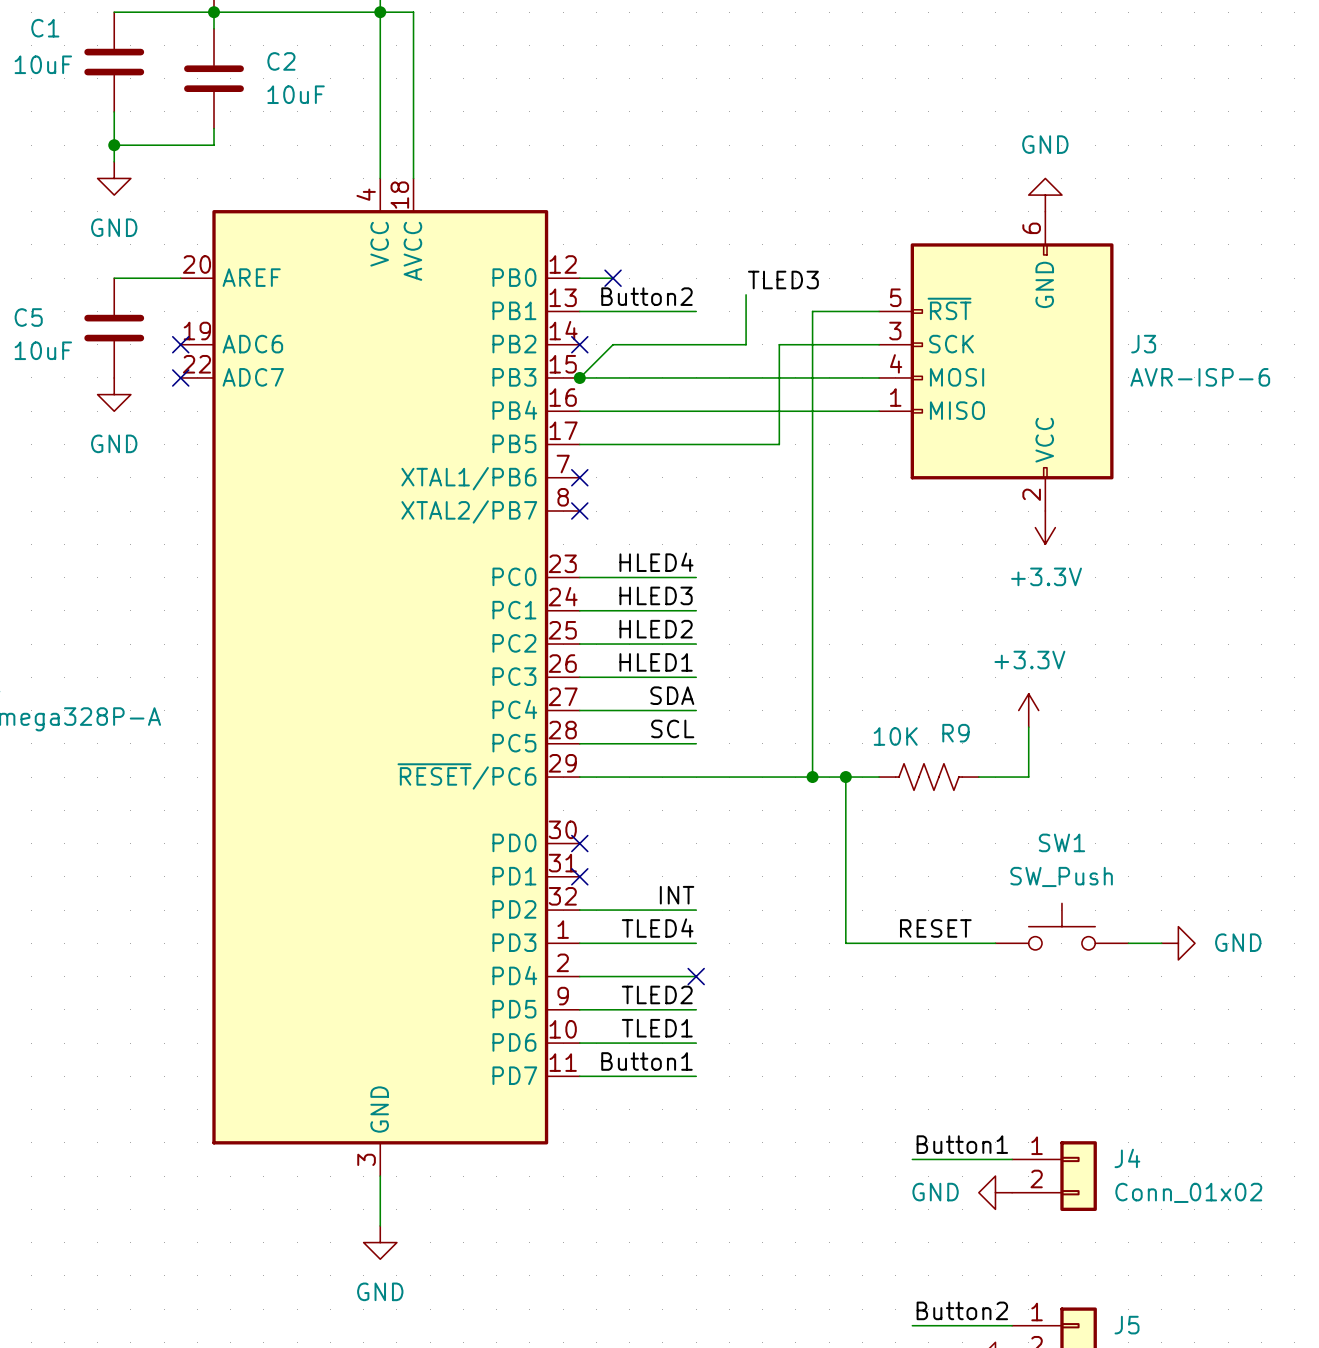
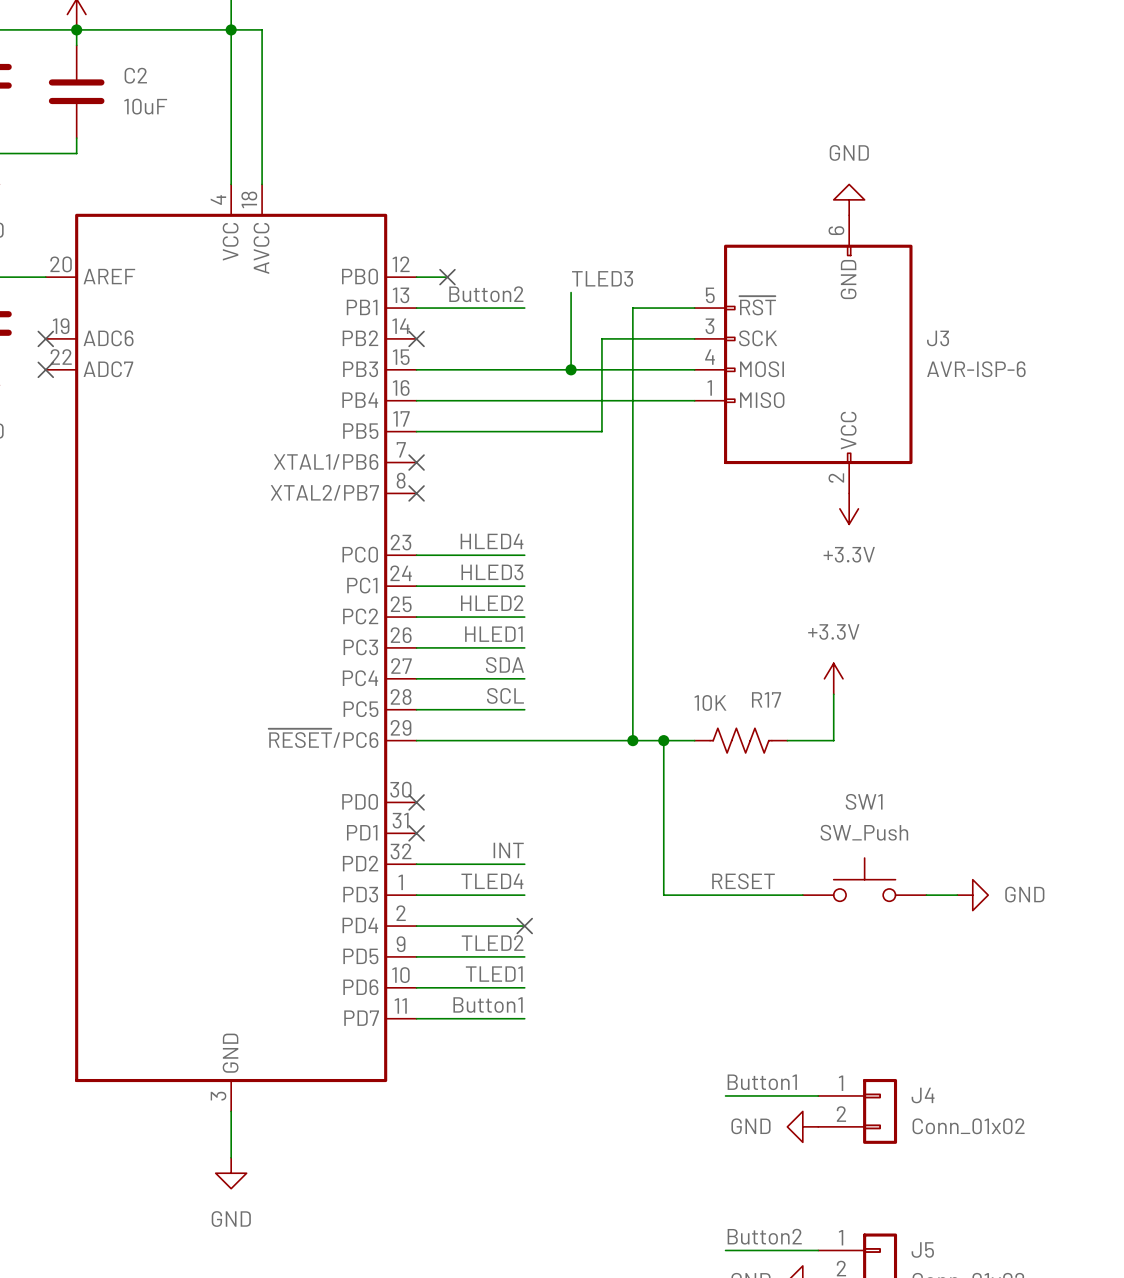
wire: (746, 344) (613, 344) (579, 377) -> (571, 338) (571, 369)
junction: (579, 377) -> none
junction: none -> (571, 369)
R9 name: R9 (955, 733) -> R17 (766, 699)

